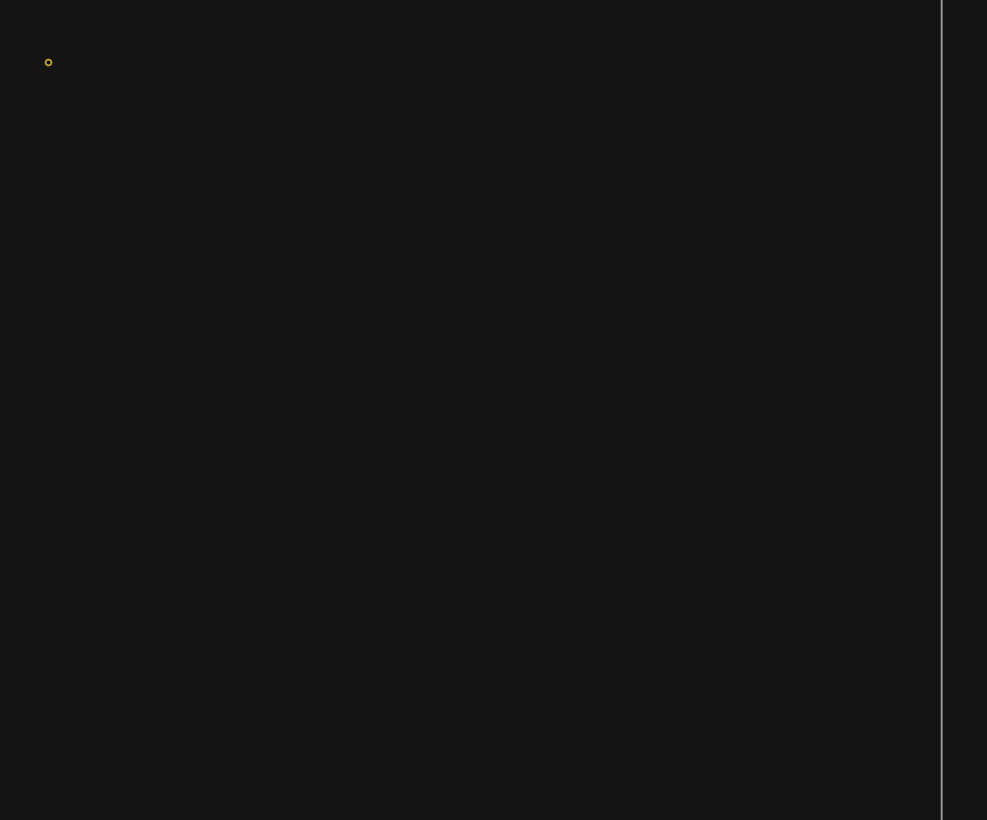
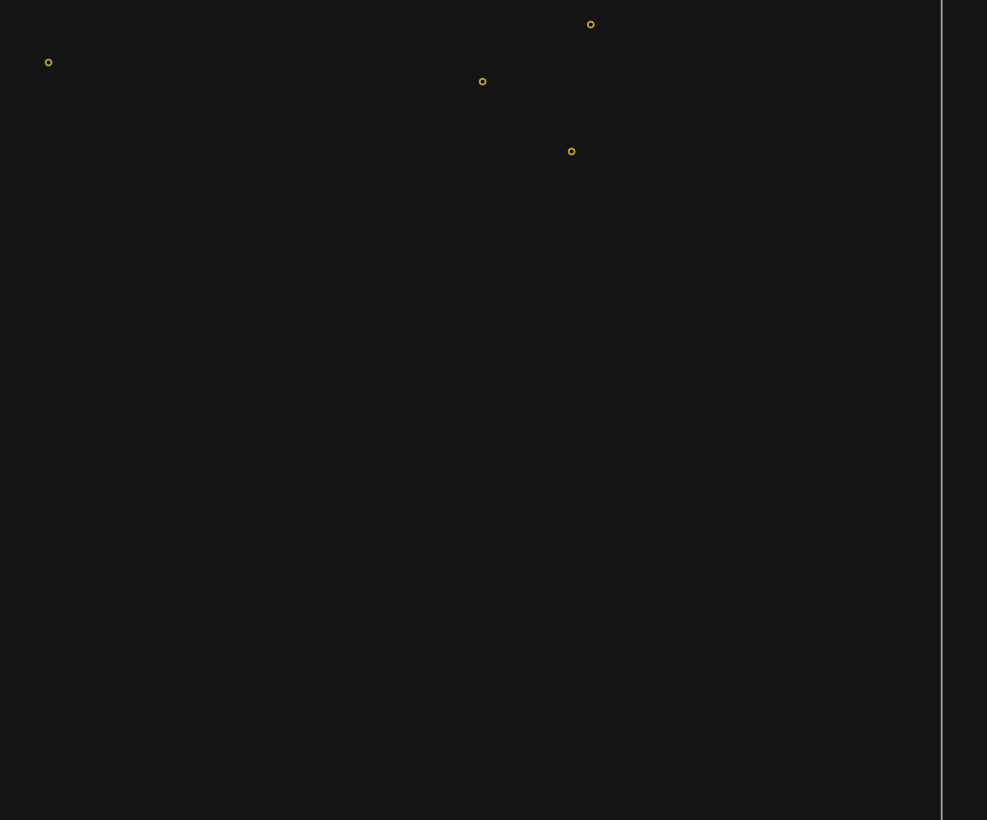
via: none -> (590, 24)
via: none -> (482, 81)
via: none -> (571, 151)

